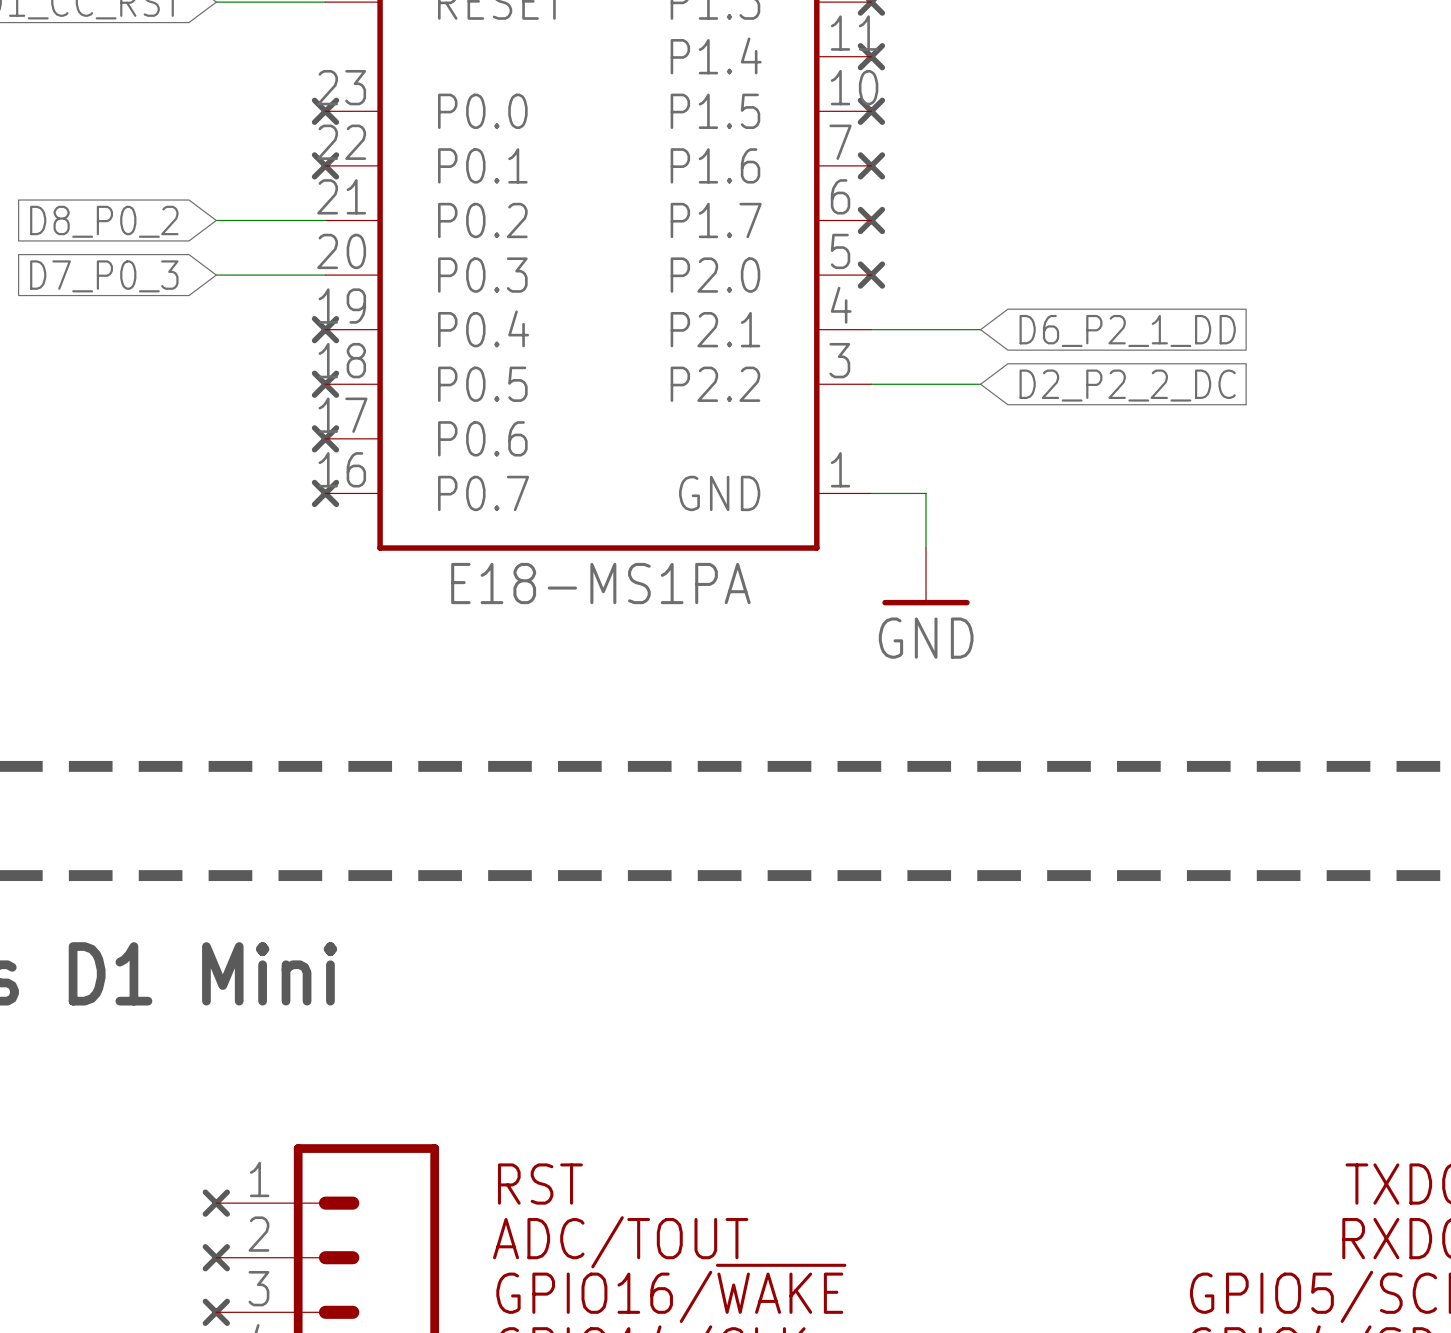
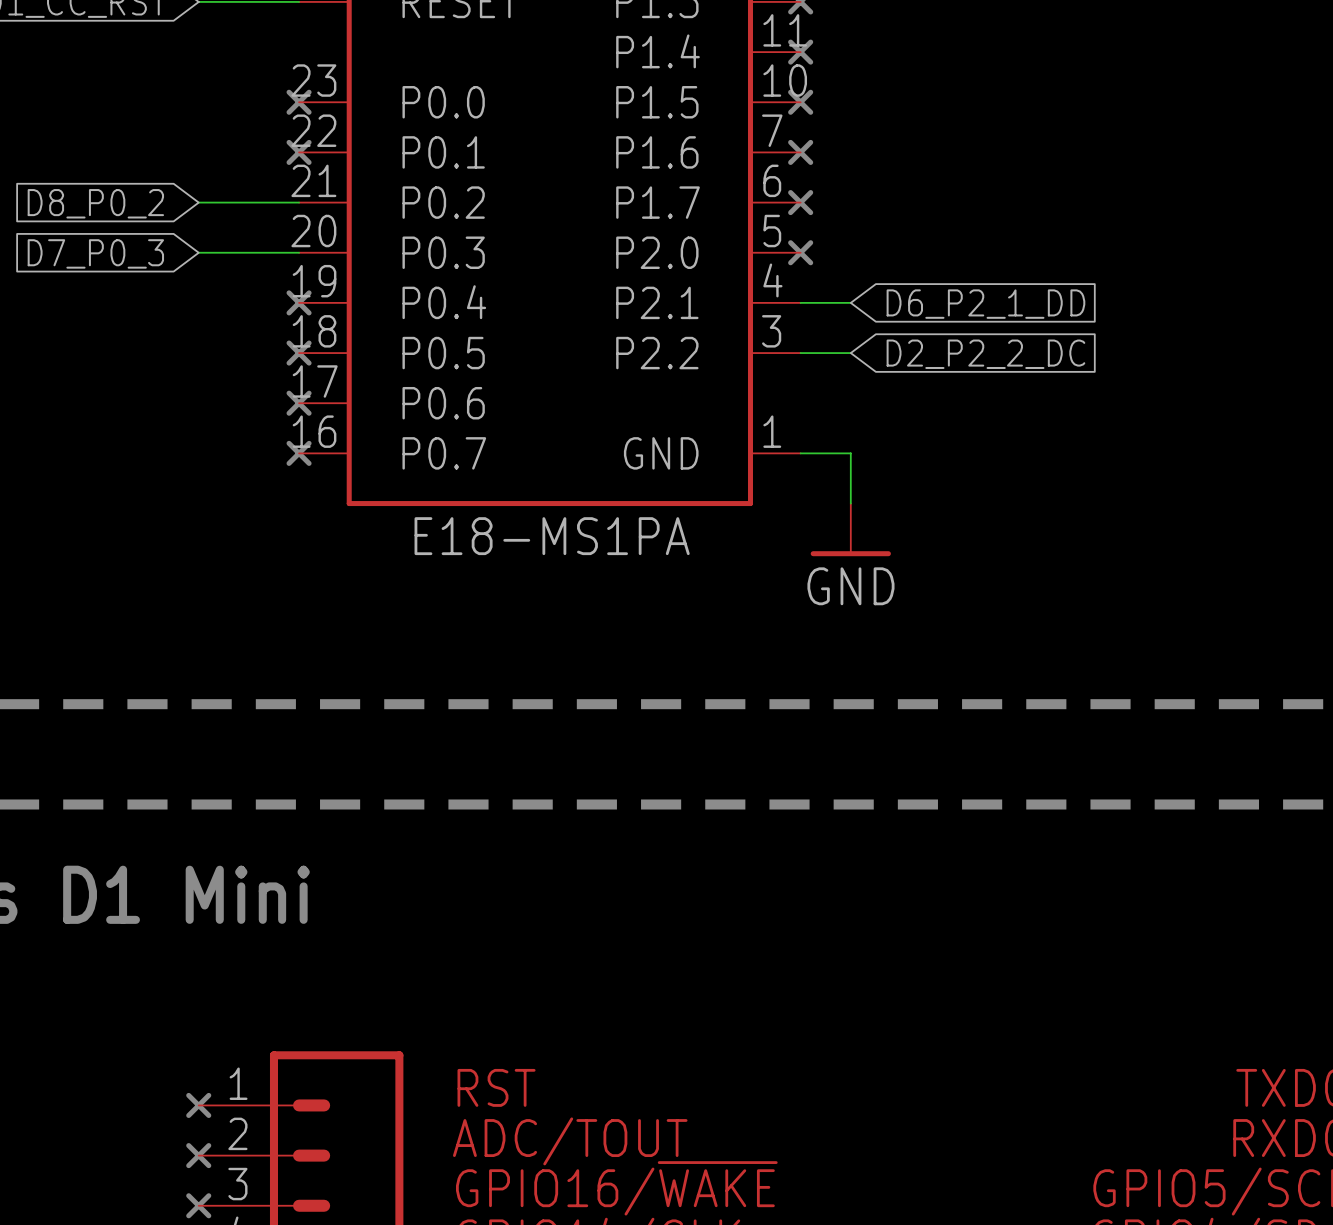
wire: (926, 329) (980, 329) -> none
global label position: D6_P2_1_DD (1127, 330) -> D6_P2_1_DD (985, 304)
wire: (926, 384) (980, 384) -> none
global label position: D2_P2_2_DC (1127, 385) -> D2_P2_2_DC (985, 354)

